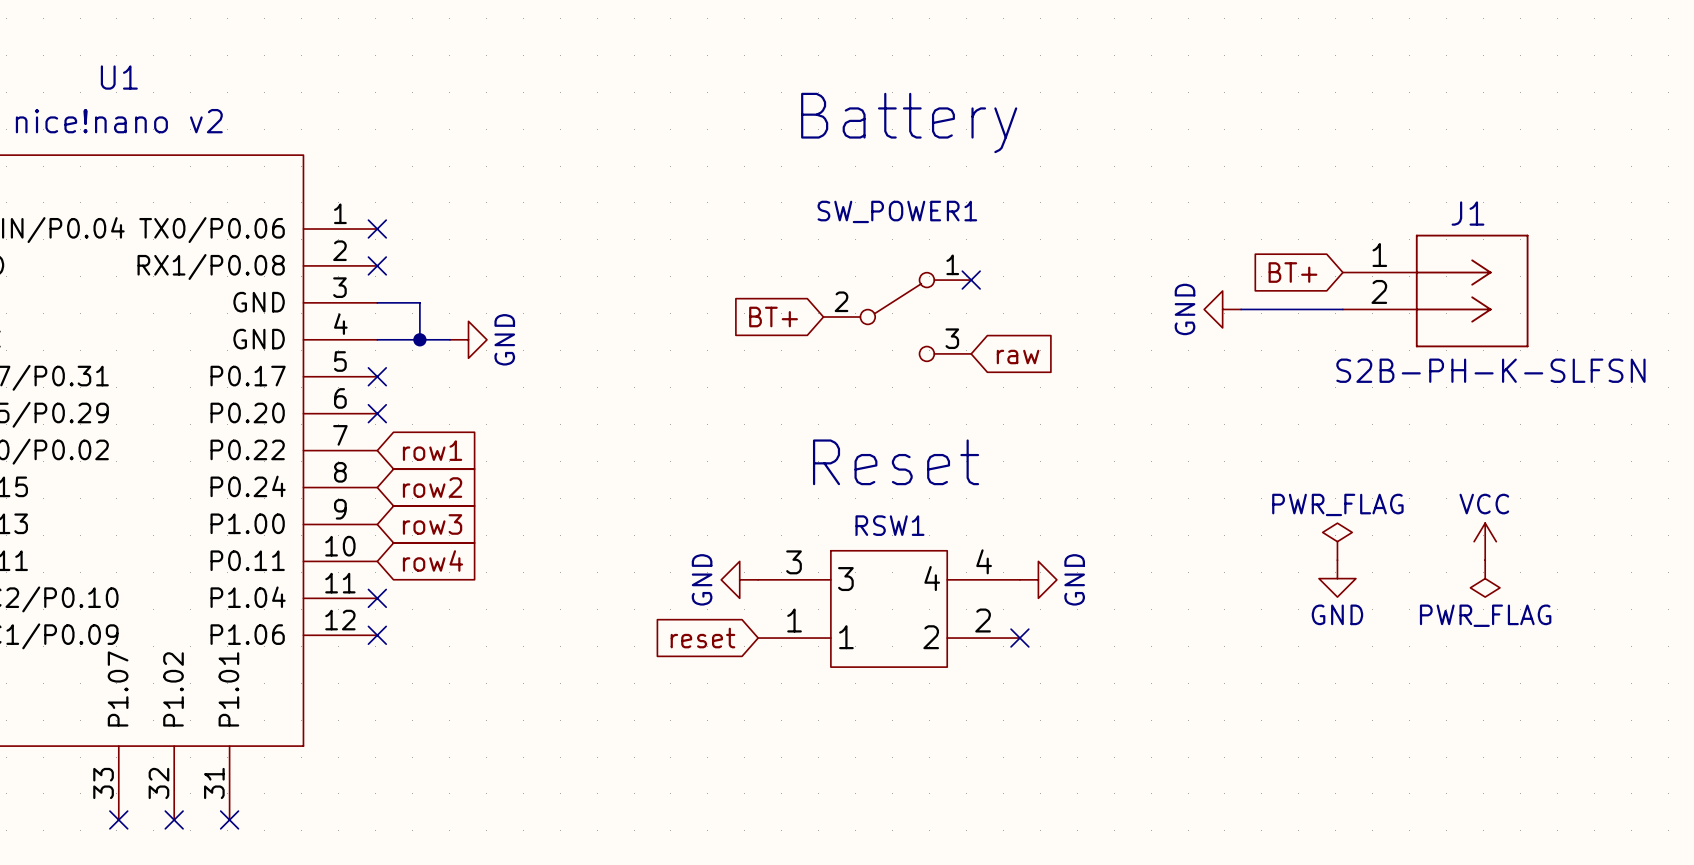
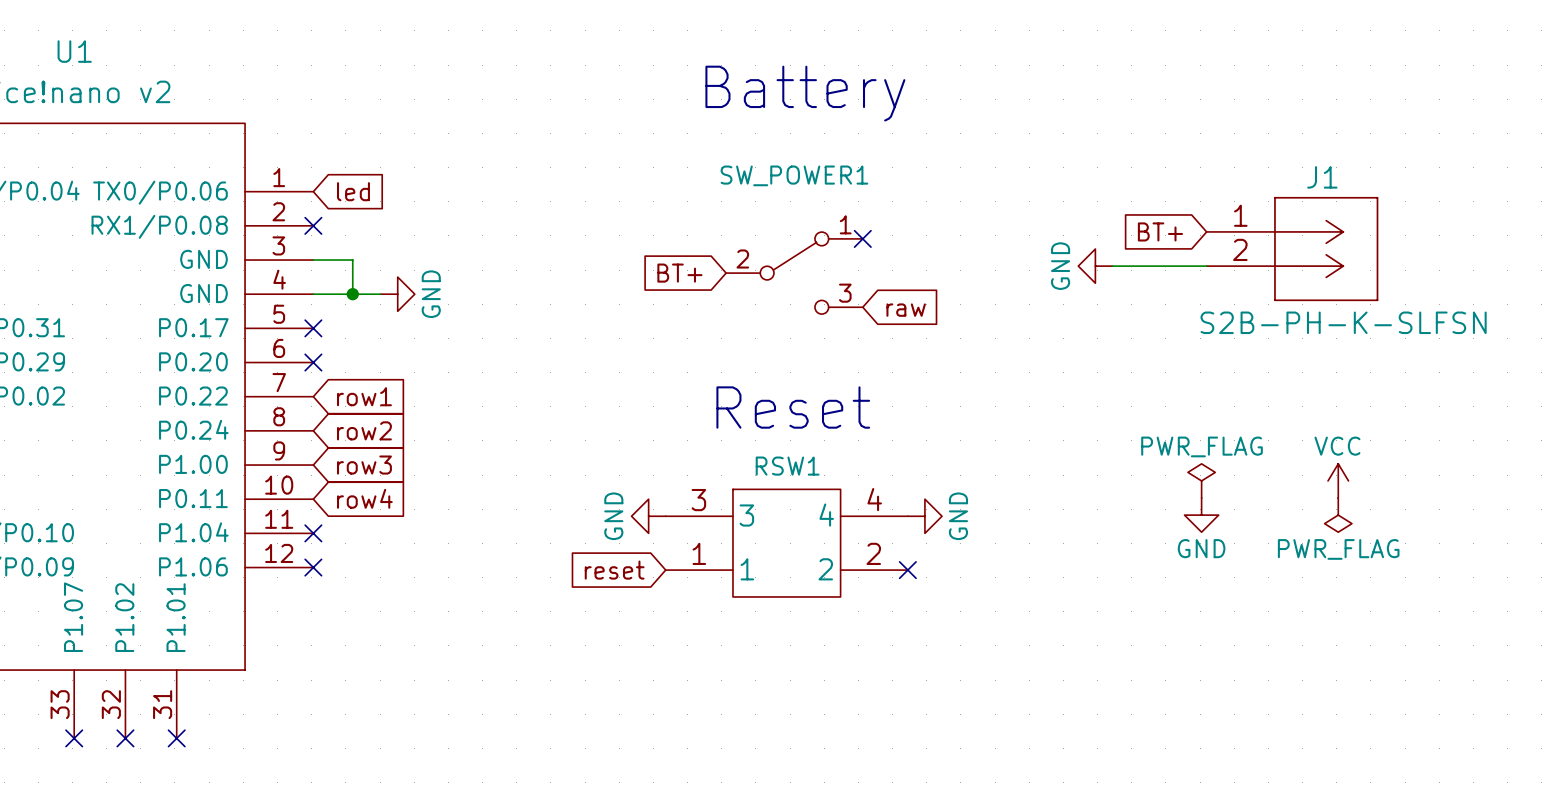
no-connect mark: (377, 229) -> none
global label: none -> led (353, 191)

